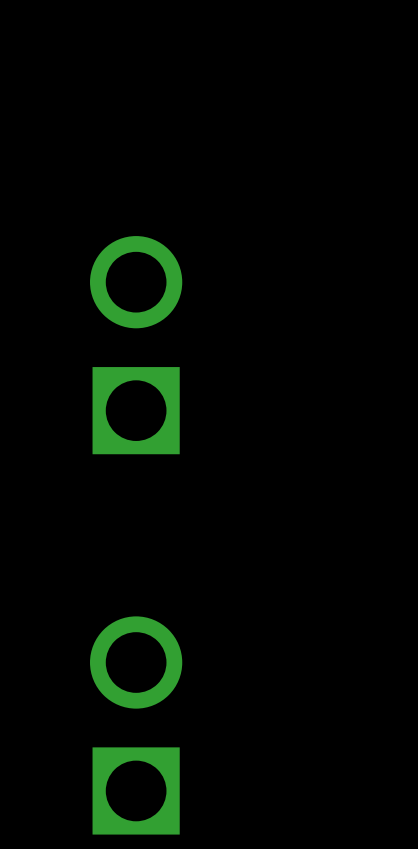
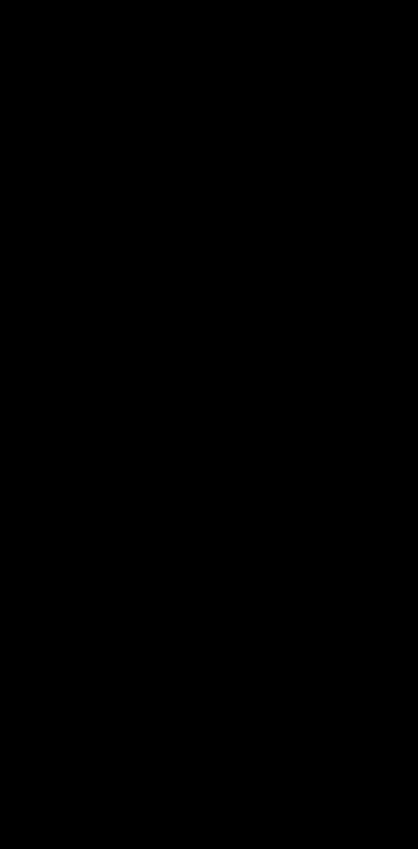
part: (136, 345) -> none
part: (136, 725) -> none

